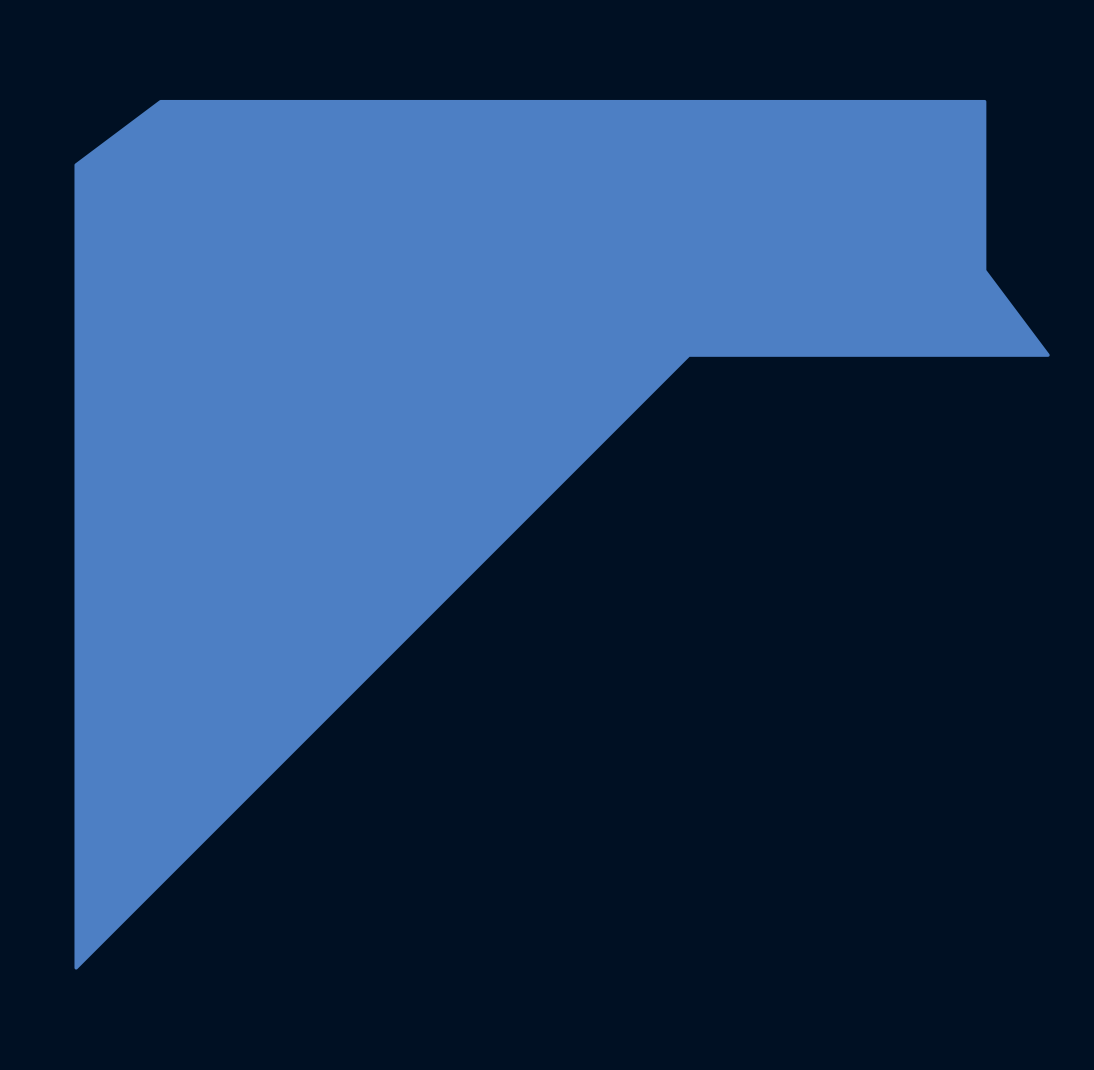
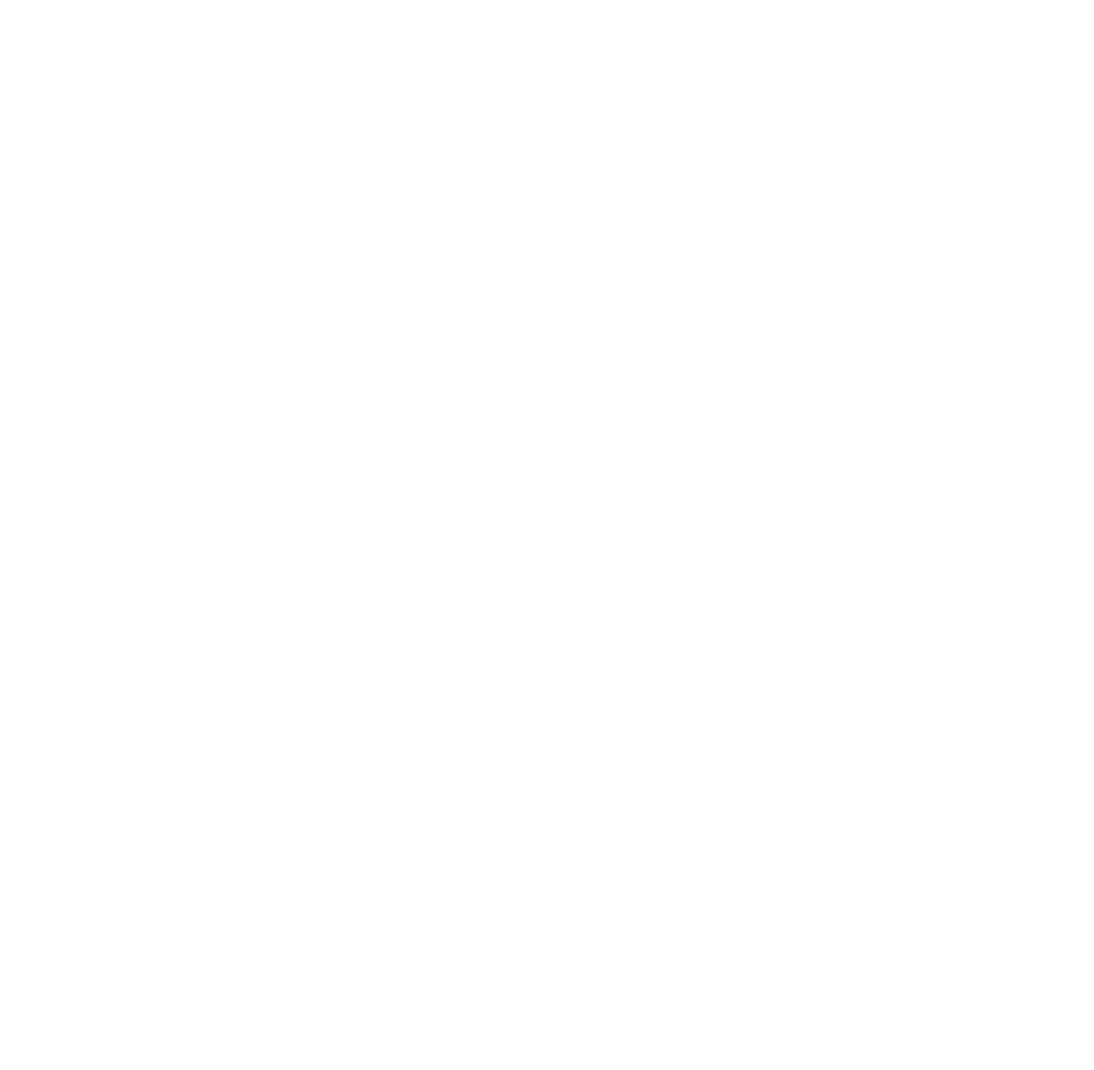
drawing: [74, 99, 1050, 970] -> none

